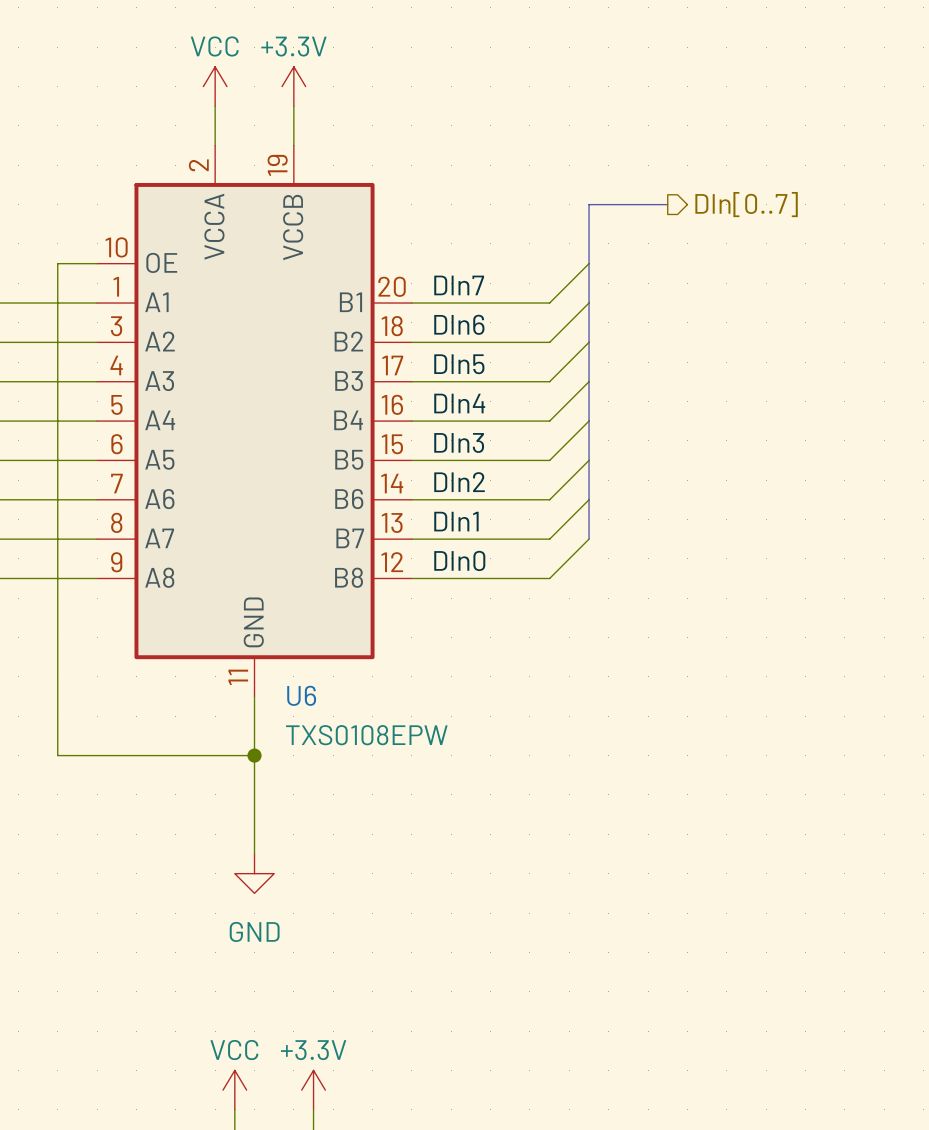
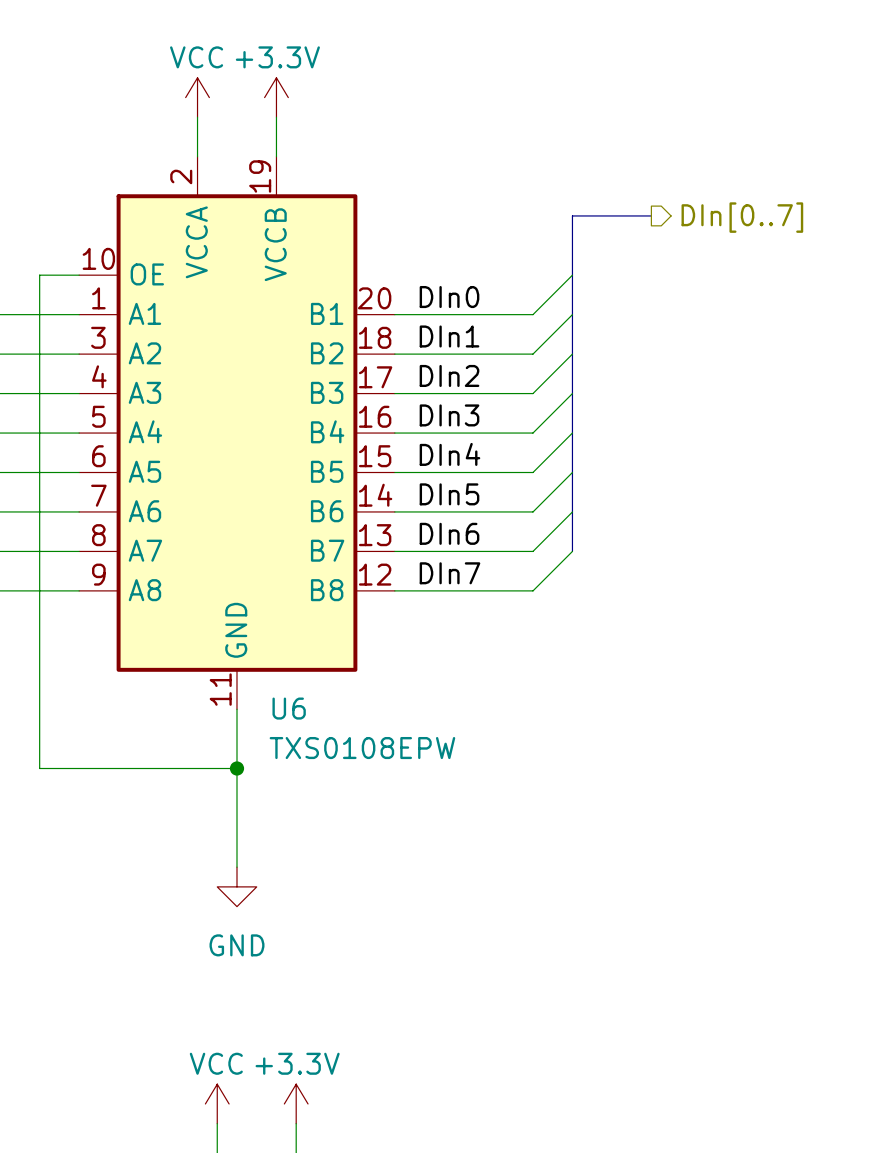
label: DIn7 (459, 285) -> DIn0 (449, 297)
label: DIn6 (459, 324) -> DIn1 (449, 336)
label: DIn5 (459, 364) -> DIn2 (449, 375)
label: DIn4 (459, 403) -> DIn3 (449, 415)
label: DIn3 (459, 442) -> DIn4 (449, 454)
label: DIn2 (459, 482) -> DIn5 (449, 494)
label: DIn1 (456, 521) -> DIn6 (449, 533)
label: DIn0 (459, 560) -> DIn7 (449, 573)

